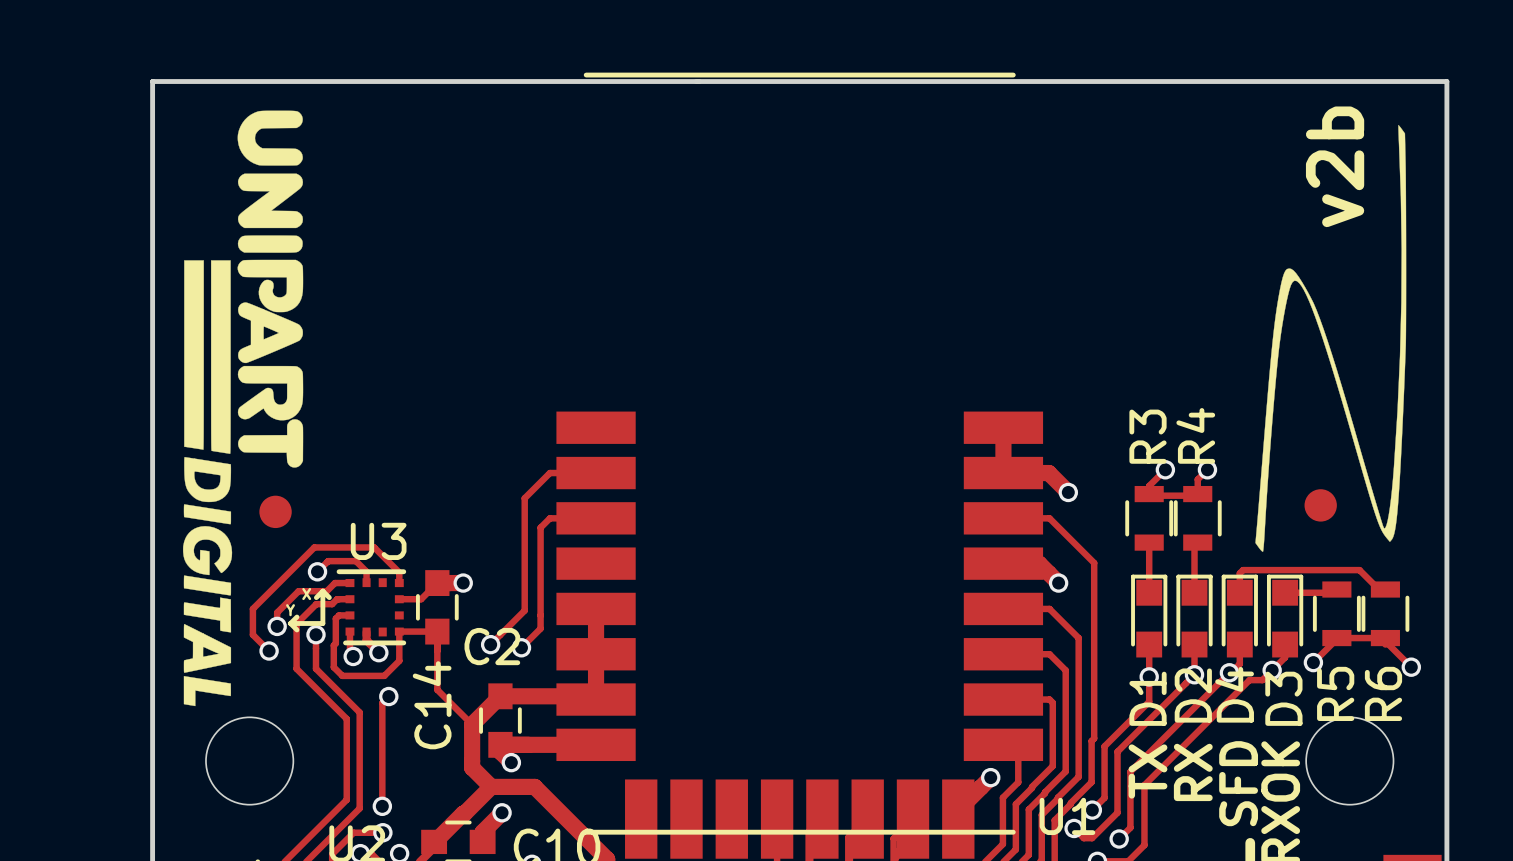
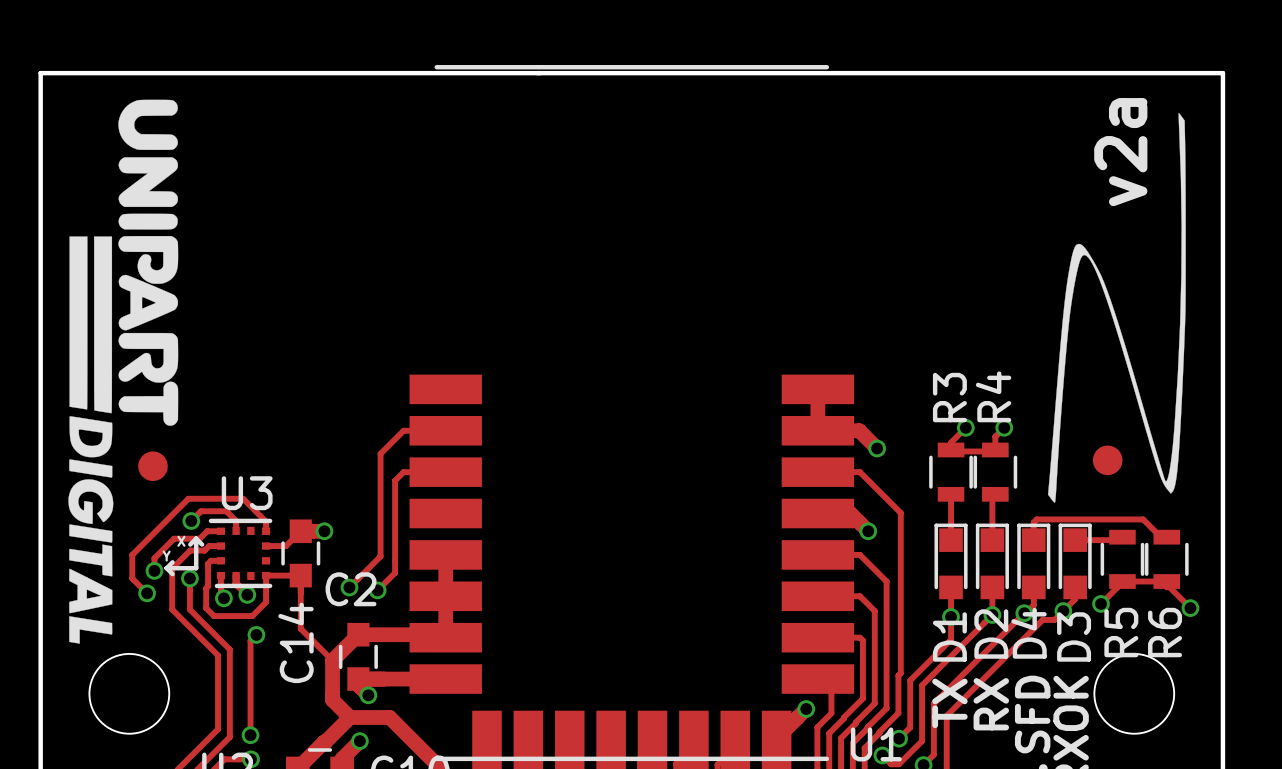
text: v2b (1335, 166) -> v2a (1120, 152)

